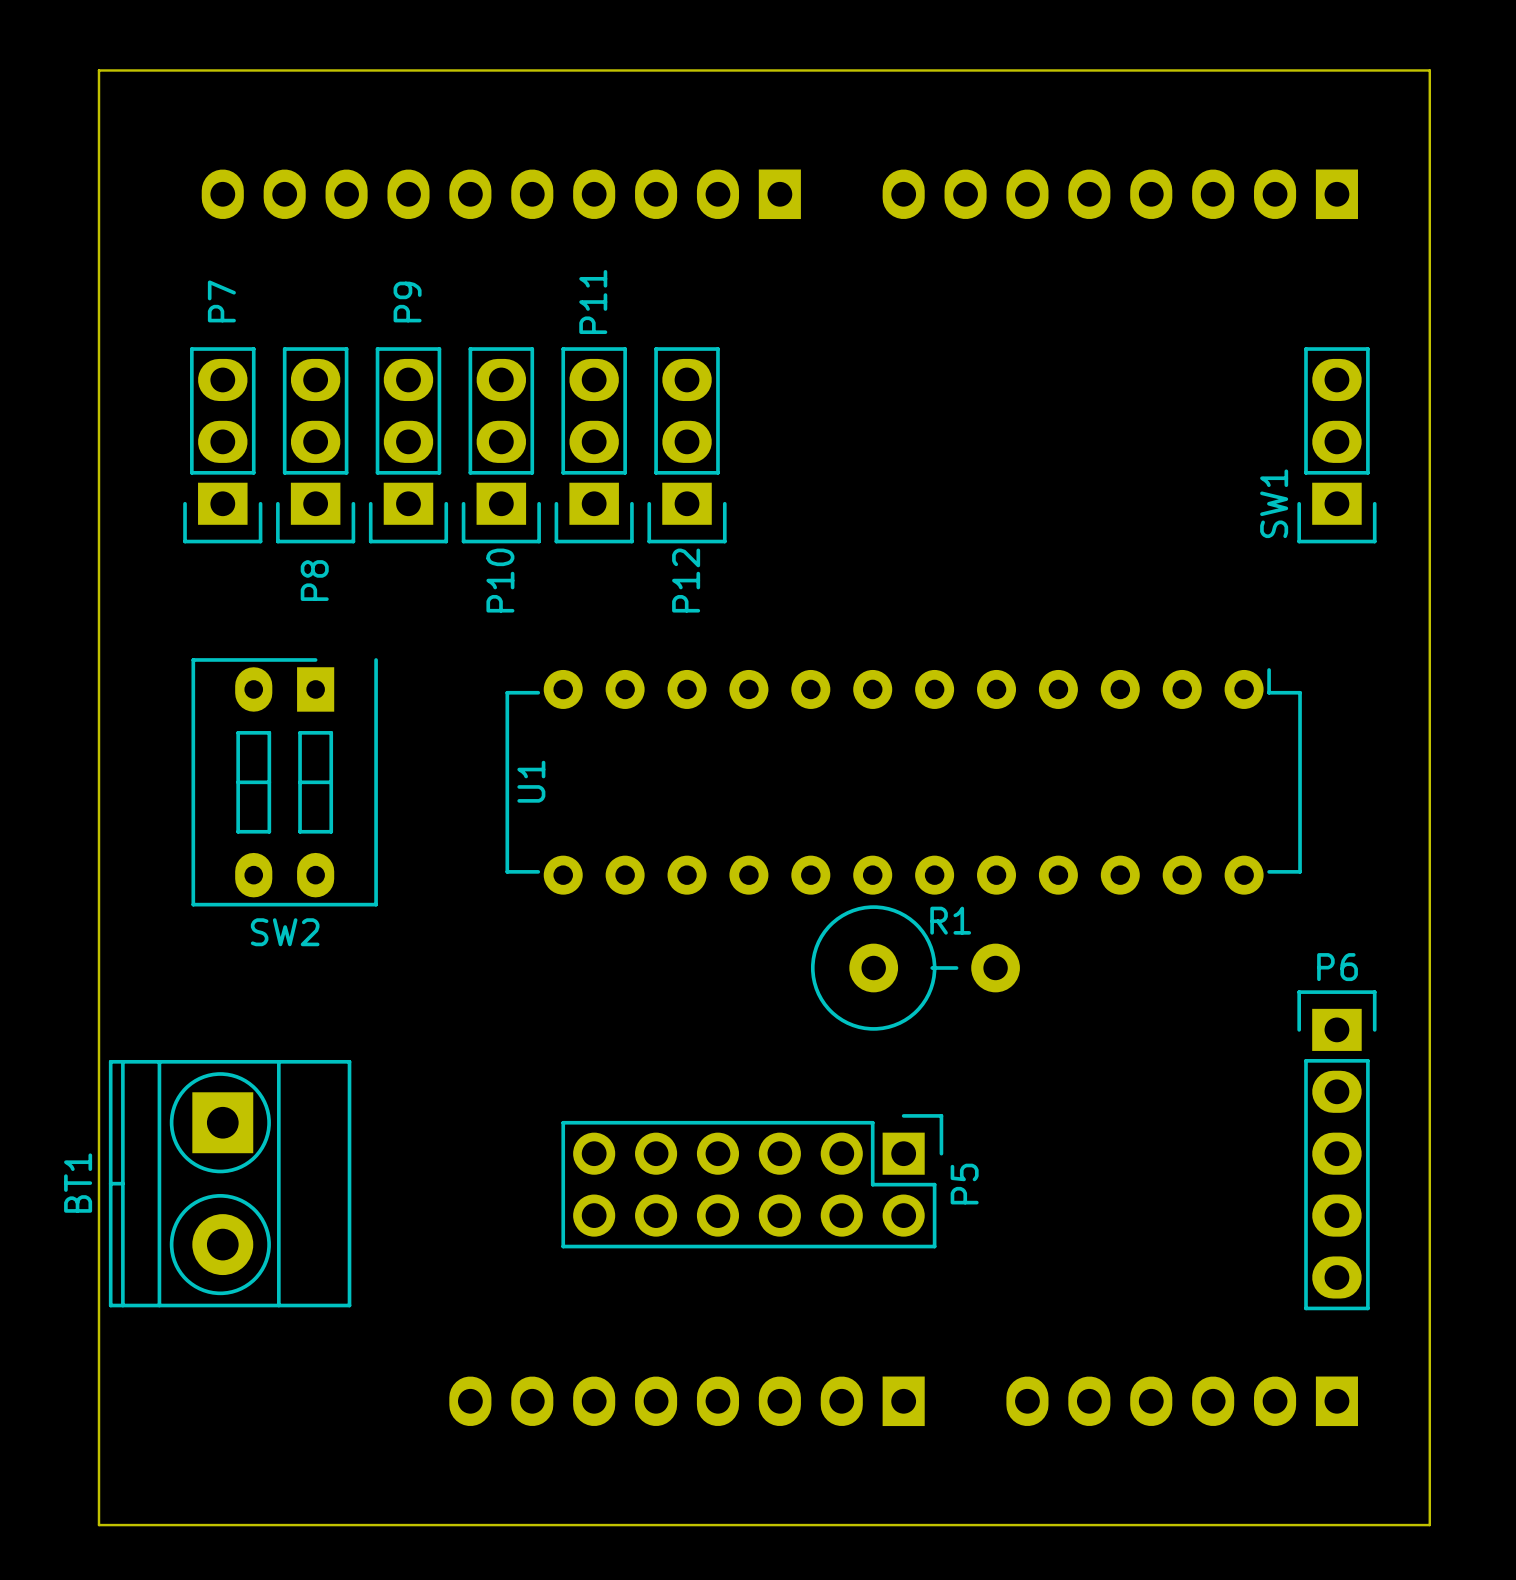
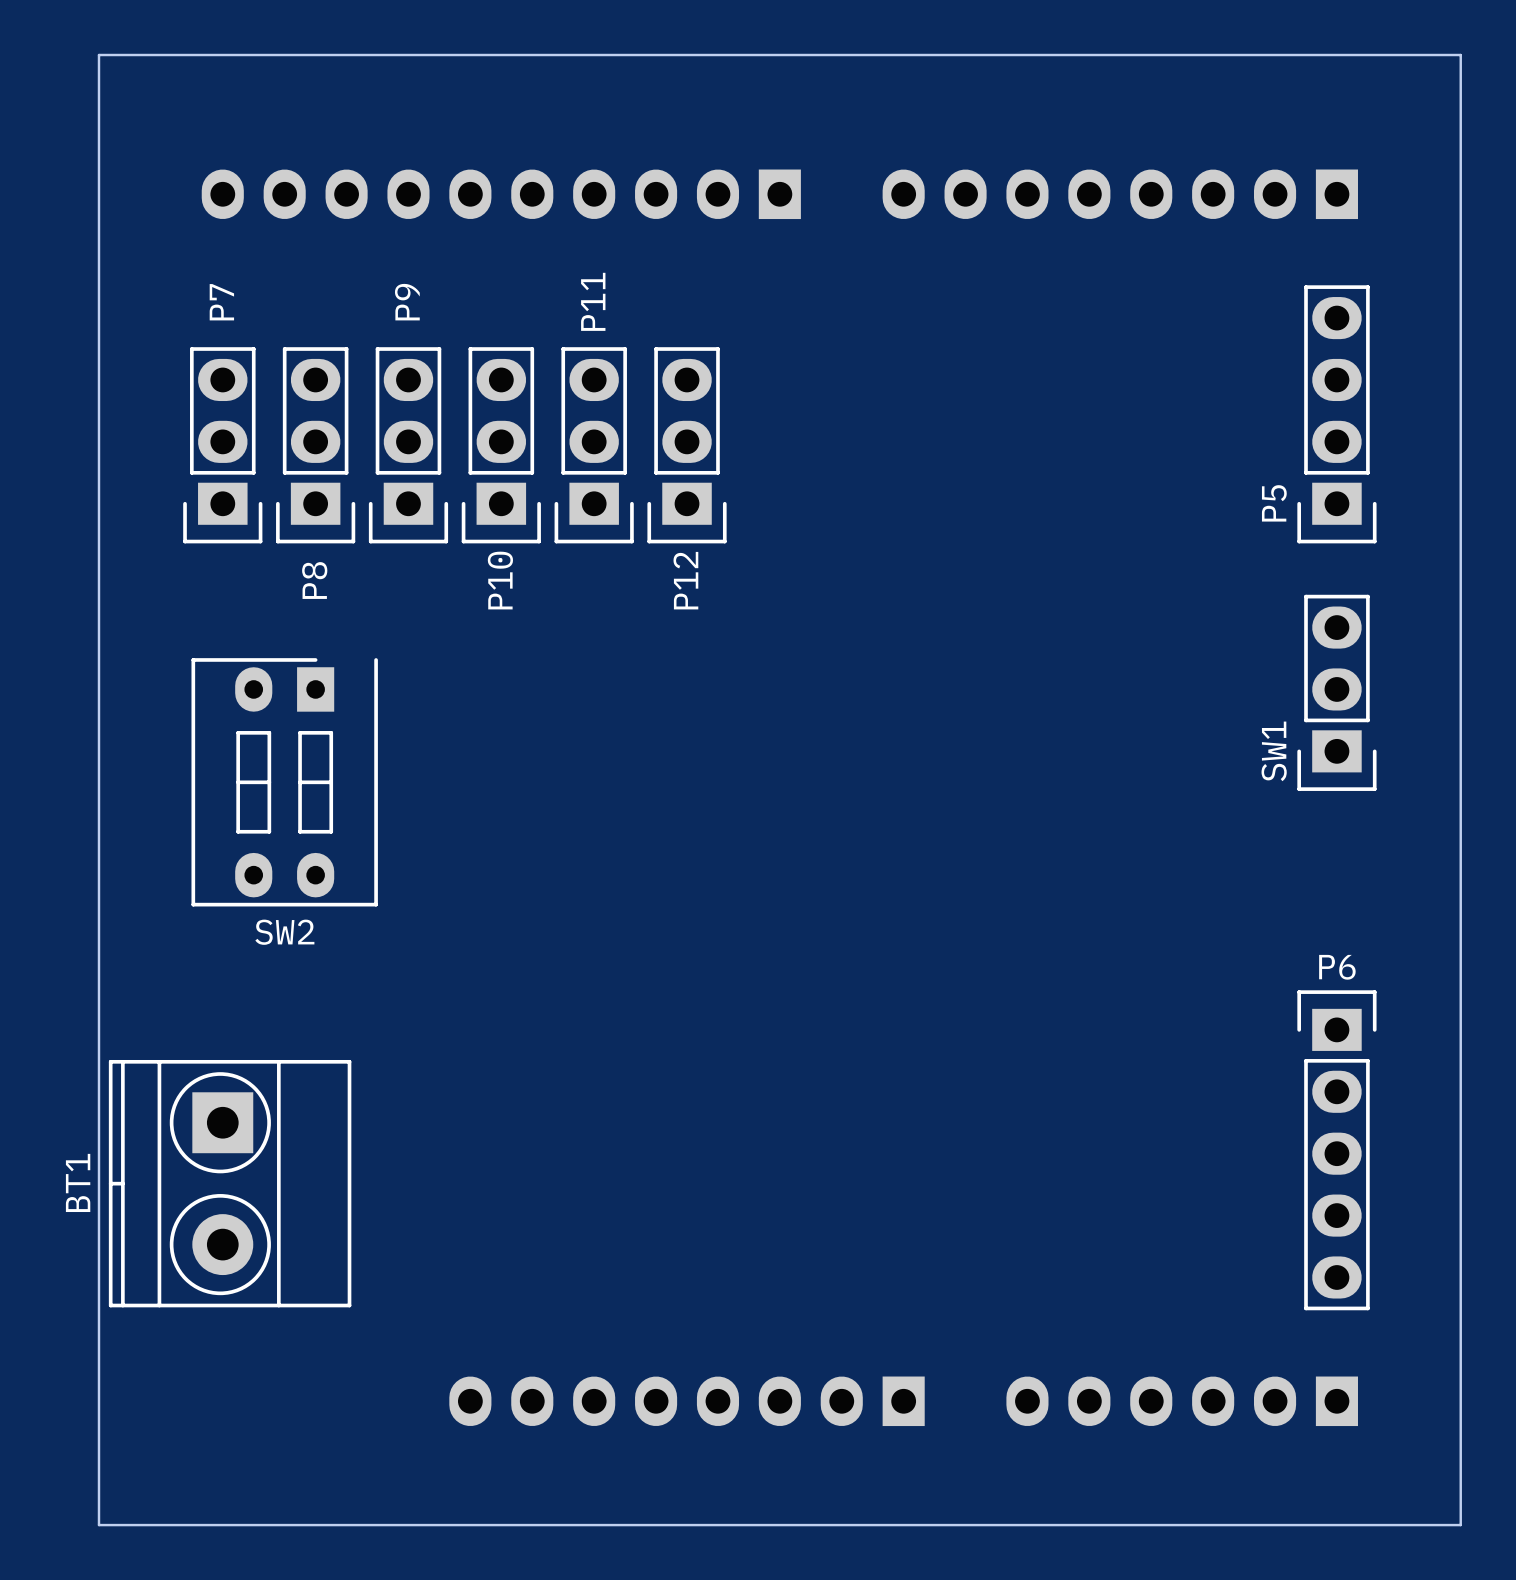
board edge: (98, 70) (1429, 70) (1429, 1525) -> (98, 70) (98, 55) (1460, 55) (1460, 1525) (1429, 1525)
SW1 position: (1336, 445) -> (1336, 692)
U1: (903, 781) -> none
R1: (915, 967) -> none
P5 footprint: [561, 1114, 944, 1249] -> [1297, 285, 1377, 544]
P5 name position: P5 (964, 1184) -> P5 (1274, 503)

